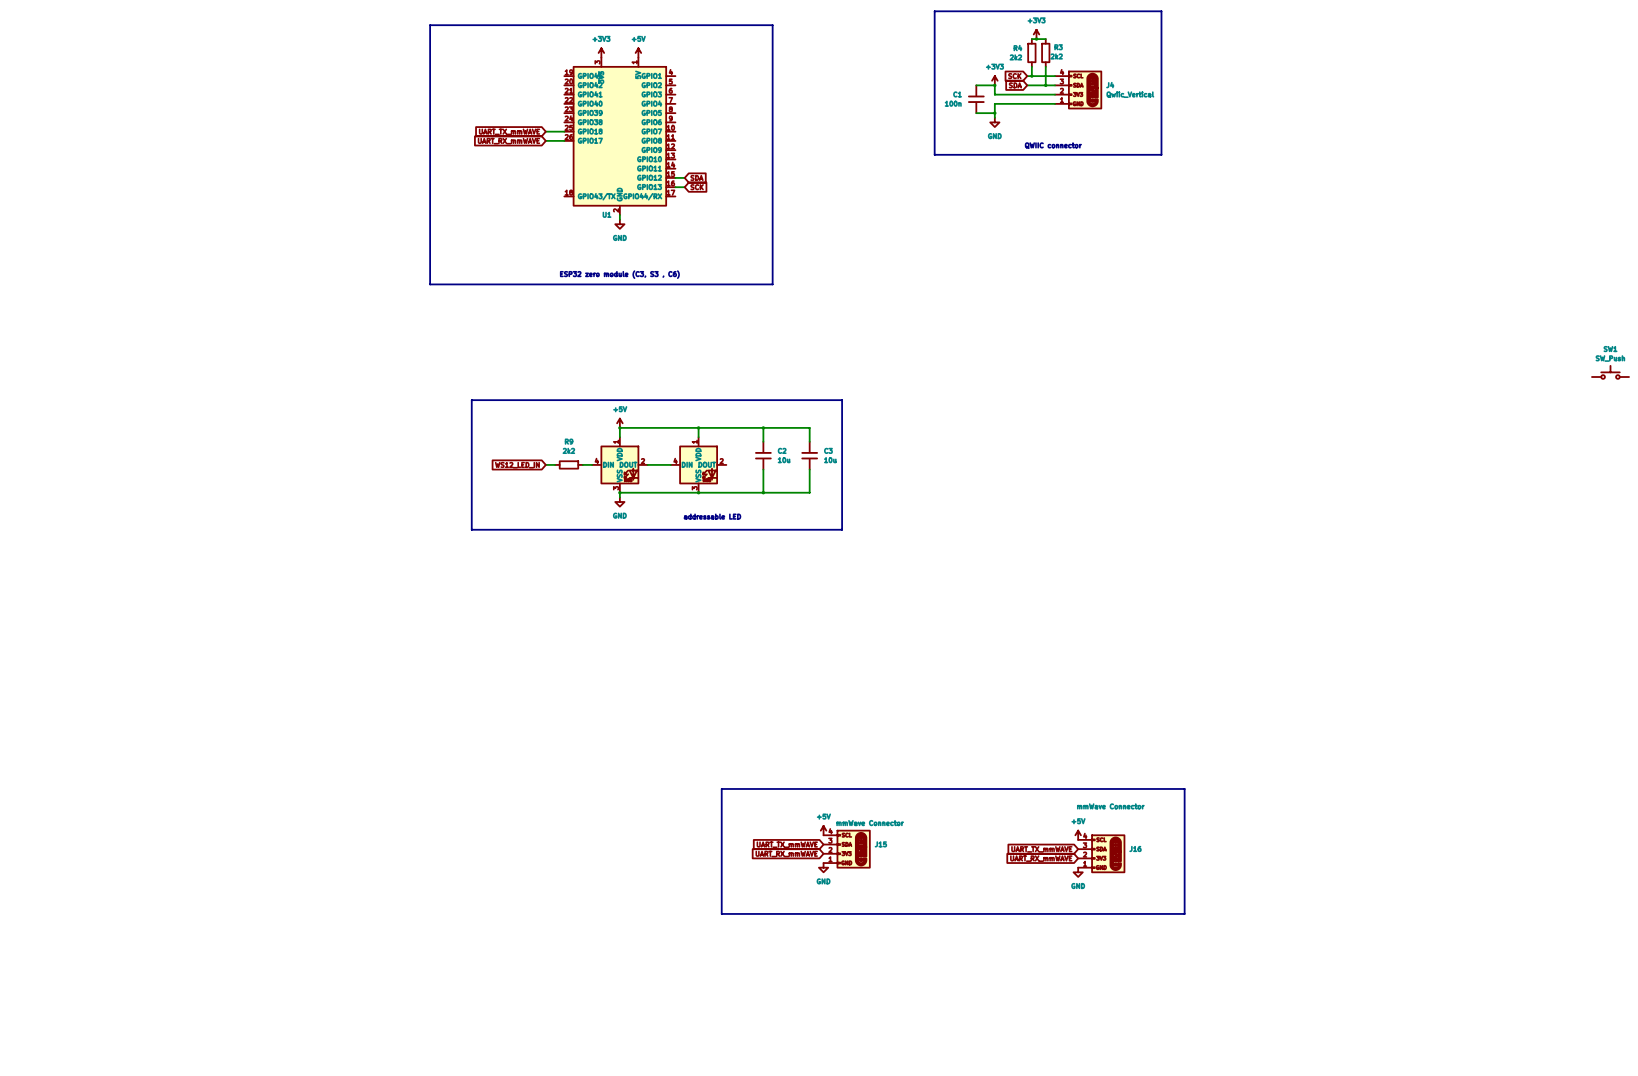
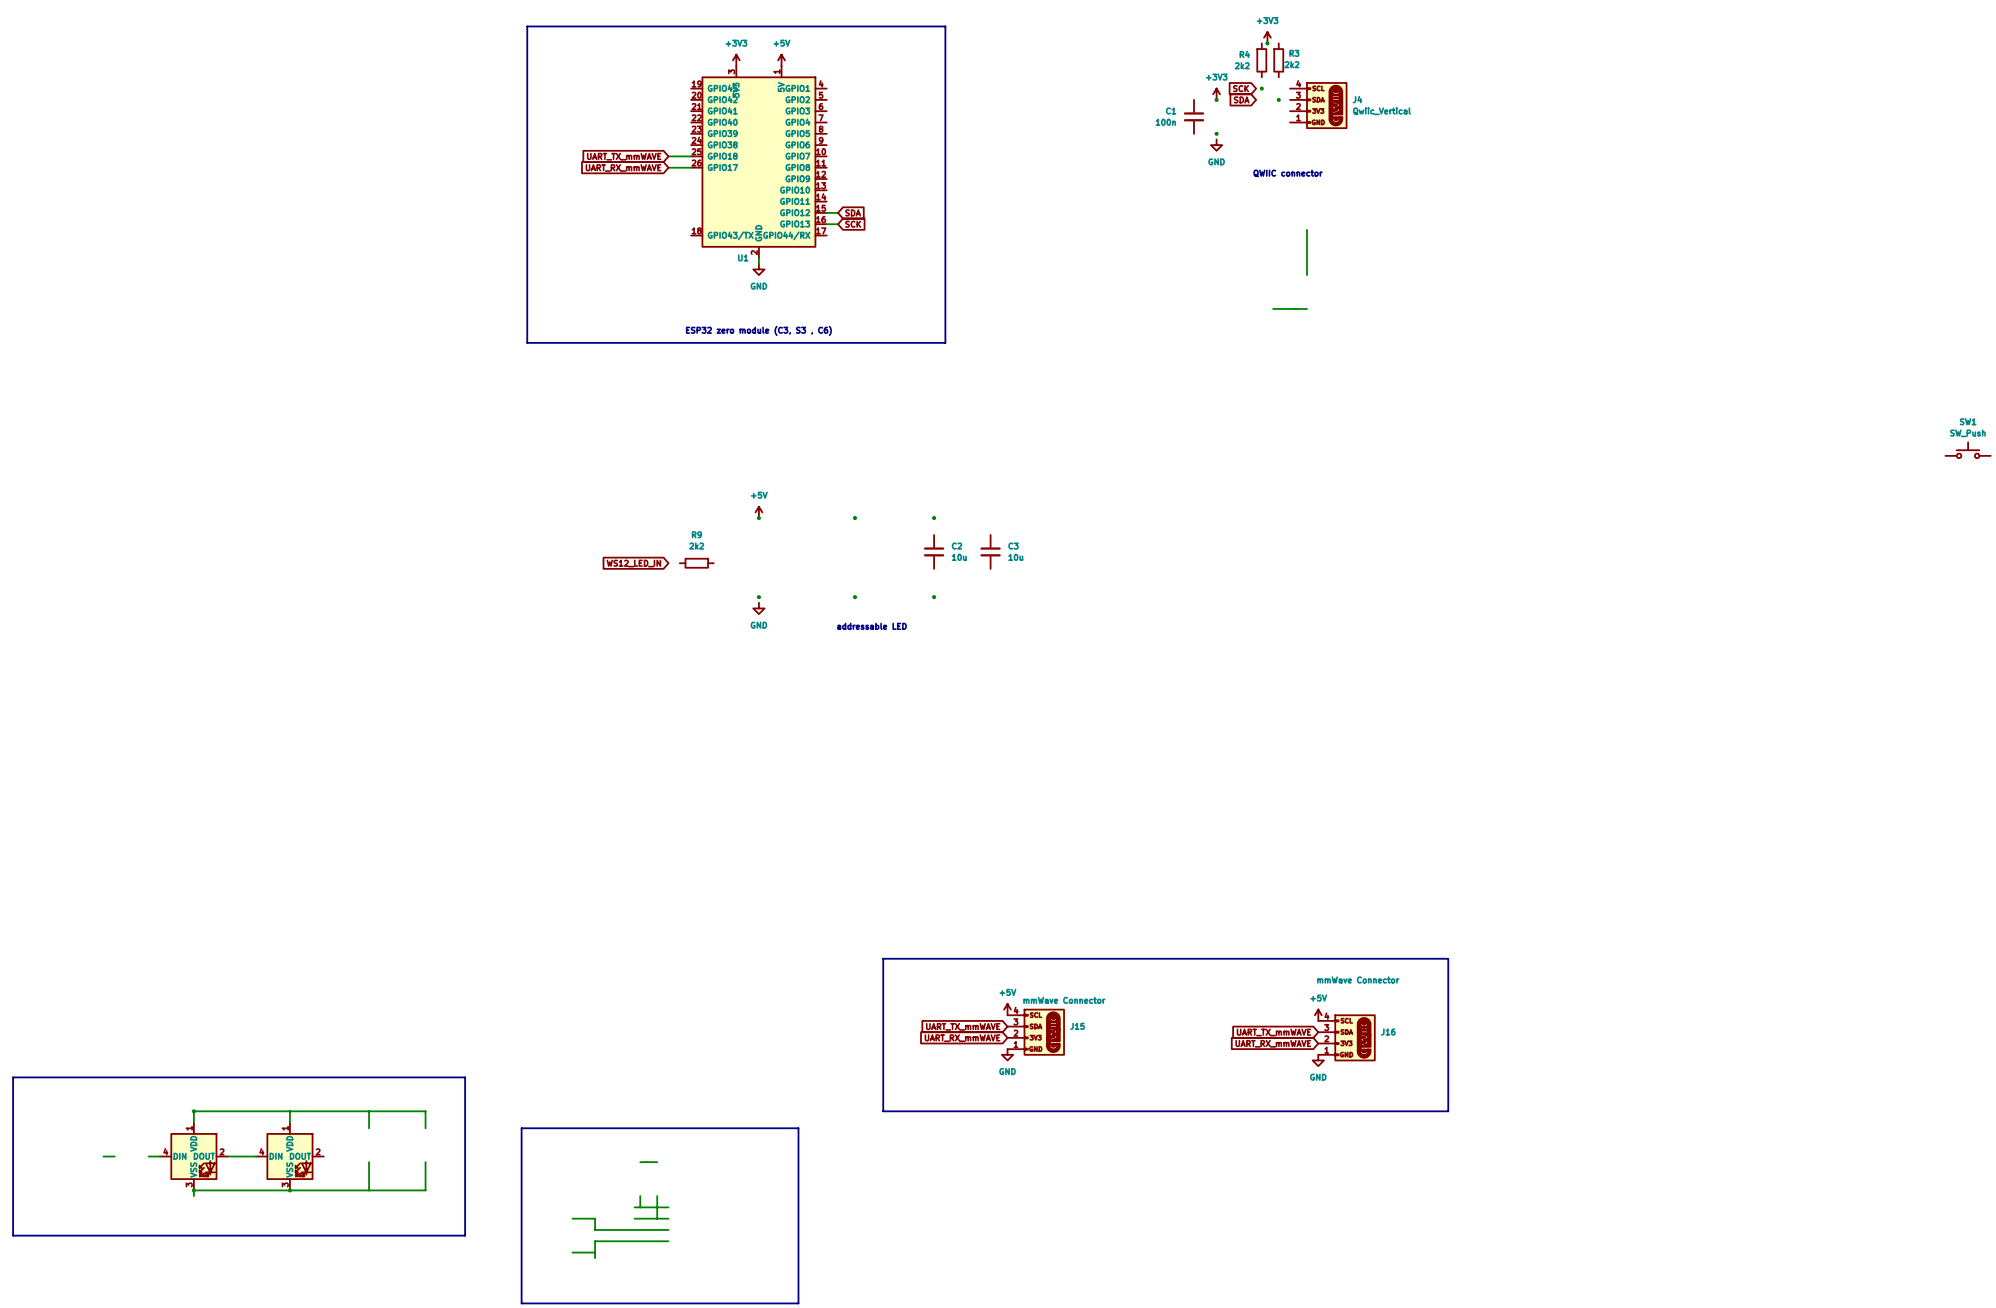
line: (934, 11) (1161, 11) (1161, 154) (934, 154) (934, 11) -> none
wire: (1031, 39) (1045, 39) -> none
wire: (1031, 66) (1031, 76) -> none
wire: (1045, 66) (1045, 85) -> none
wire: (1027, 76) (1055, 76) -> none
wire: (976, 85) (994, 85) (994, 94) (1055, 94) -> none
wire: (1027, 85) (1055, 85) -> none
wire: (1055, 103) (994, 103) (994, 117) -> none
wire: (976, 113) (994, 113) -> none
wire: none -> (1307, 229) (1307, 275)
wire: none -> (1273, 308) (1307, 308)
line: (471, 400) (842, 400) (842, 529) (471, 529) (471, 400) -> none
wire: (698, 427) (698, 437) -> none
wire: (763, 427) (763, 441) -> none
wire: (619, 437) (619, 427) (809, 427) (809, 441) -> none
wire: (545, 464) (555, 464) -> none
wire: (582, 464) (592, 464) -> none
part: (619, 464) -> none
wire: (647, 464) (670, 464) -> none
part: (698, 464) -> none
wire: (763, 469) (763, 492) -> none
wire: (809, 469) (809, 492) (619, 492) (619, 497) -> none
line: none -> (13, 1077) (465, 1077) (465, 1235) (13, 1235) (13, 1077)
junction: none -> (193, 1111)
wire: none -> (289, 1111) (289, 1122)
wire: none -> (369, 1111) (369, 1128)
wire: none -> (193, 1122) (193, 1111) (425, 1111) (425, 1128)
line: none -> (521, 1128) (798, 1128) (798, 1303) (521, 1303) (521, 1128)
wire: none -> (103, 1156) (114, 1156)
wire: none -> (148, 1156) (159, 1156)
part: none -> (193, 1156)
wire: none -> (227, 1156) (256, 1156)
part: none -> (289, 1156)
wire: none -> (369, 1162) (369, 1190)
wire: none -> (425, 1162) (425, 1190) (193, 1190) (193, 1196)
wire: none -> (640, 1162) (657, 1162)
junction: none -> (193, 1190)
junction: none -> (289, 1190)
wire: none -> (640, 1196) (640, 1207)
wire: none -> (657, 1196) (657, 1218)
wire: none -> (634, 1207) (668, 1207)
wire: none -> (572, 1218) (595, 1218) (595, 1229) (668, 1229)
wire: none -> (634, 1218) (668, 1218)
wire: none -> (668, 1241) (595, 1241) (595, 1258)
wire: none -> (572, 1252) (595, 1252)

